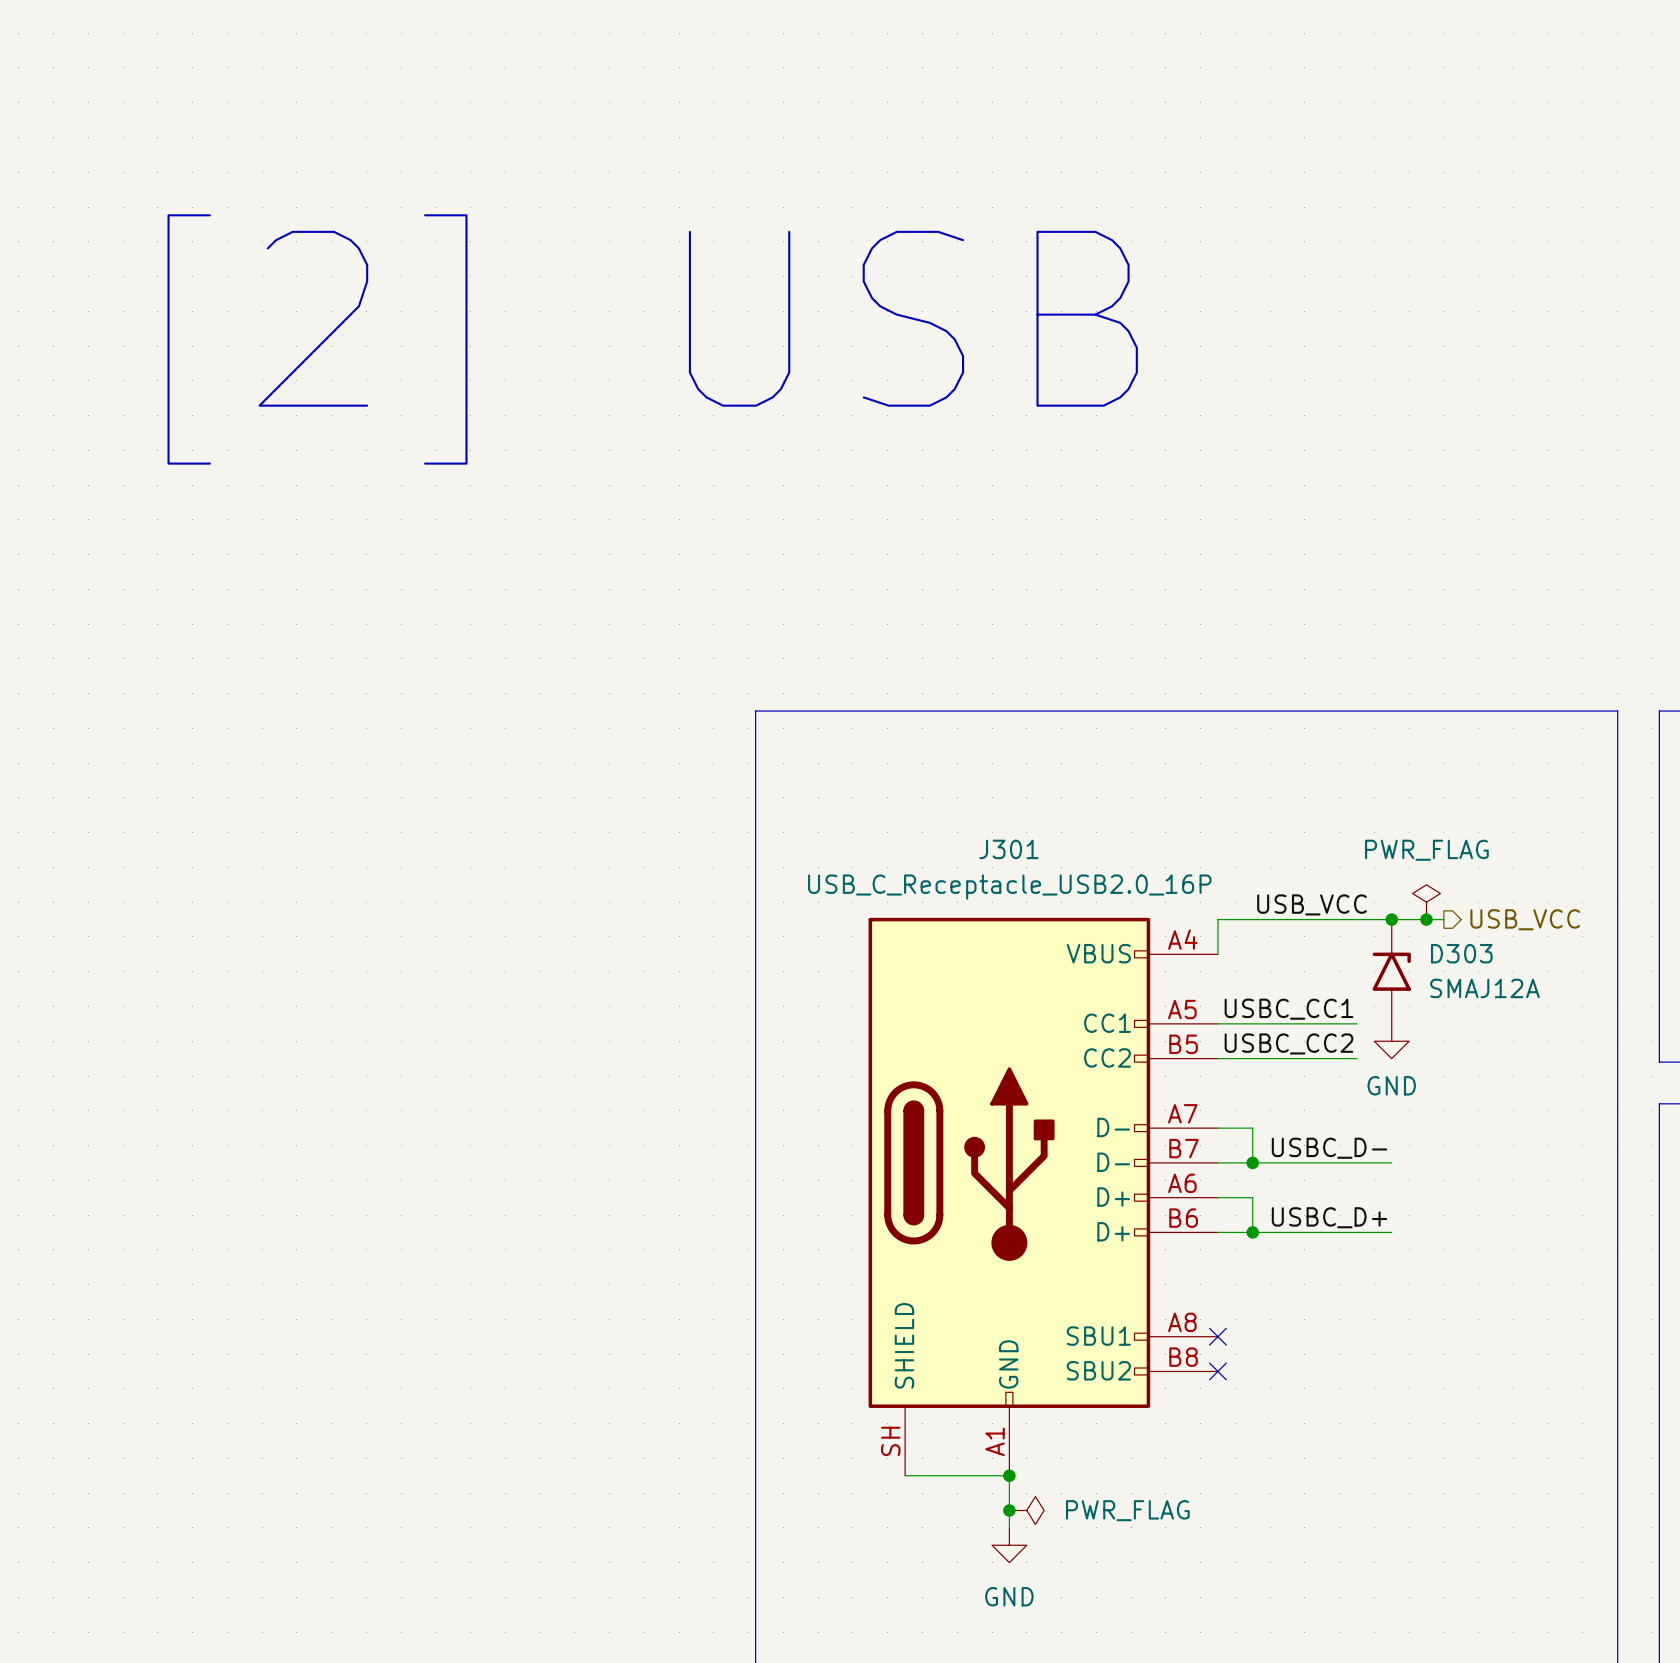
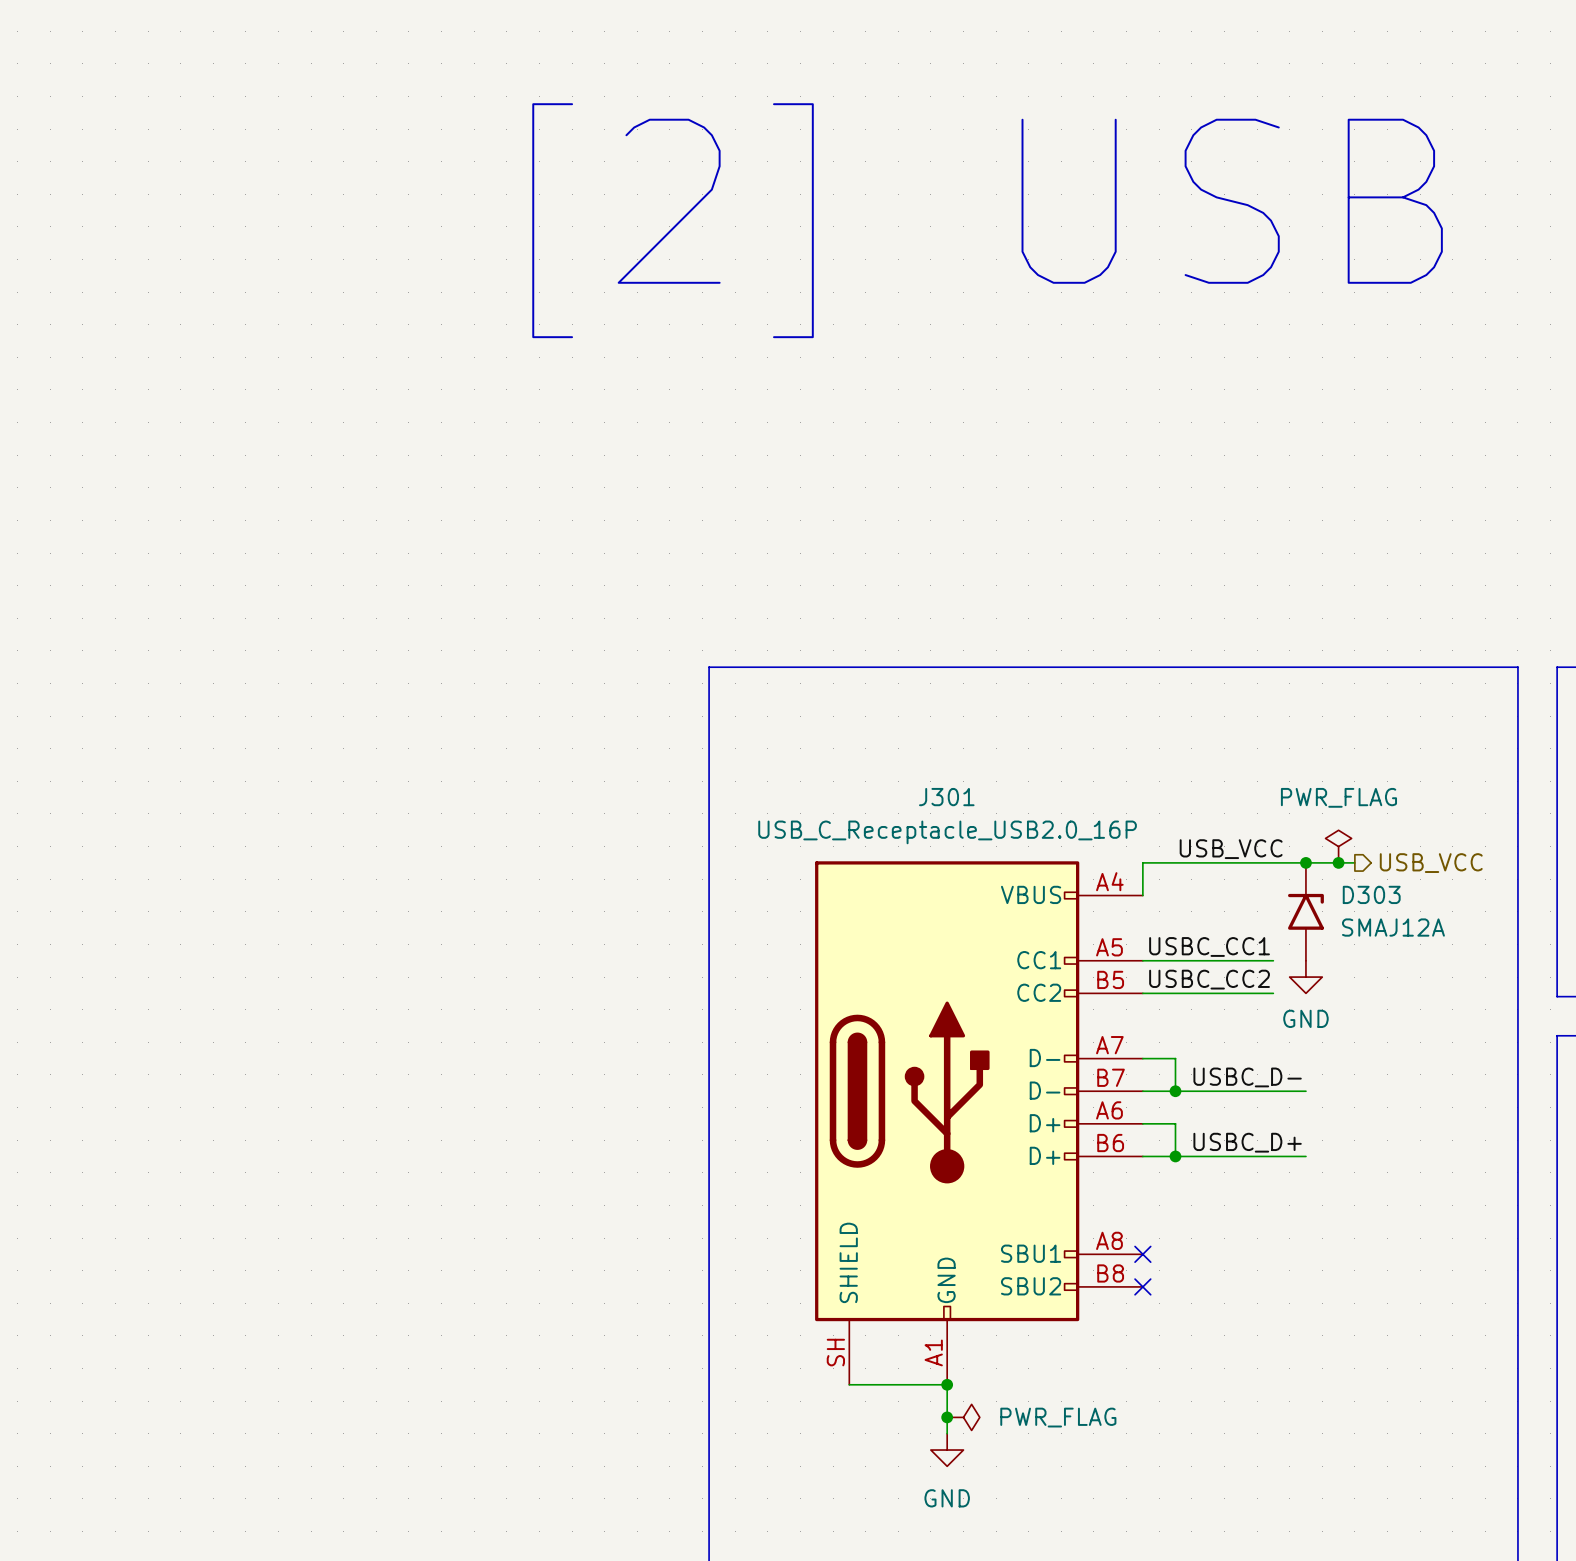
text: none -> [2] USB (987, 220)
text: [2] USB (652, 339) -> none

